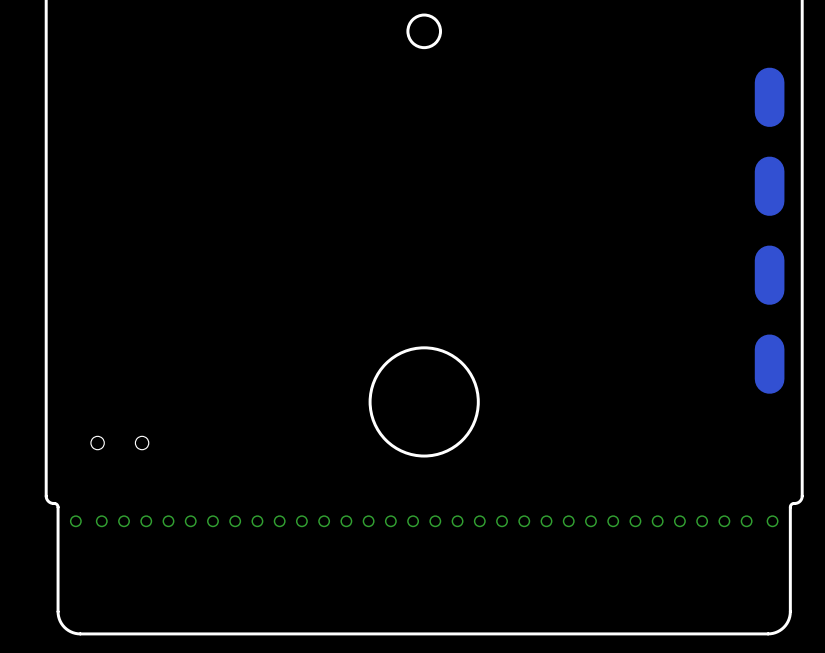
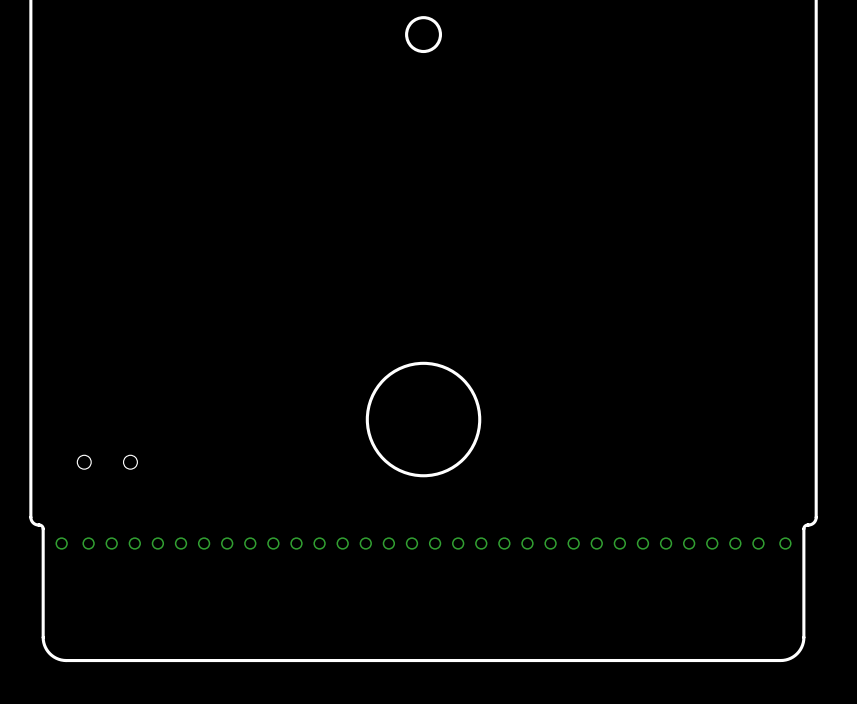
part: (769, 97) -> none
part: (769, 186) -> none
part: (769, 275) -> none
part: (769, 364) -> none

